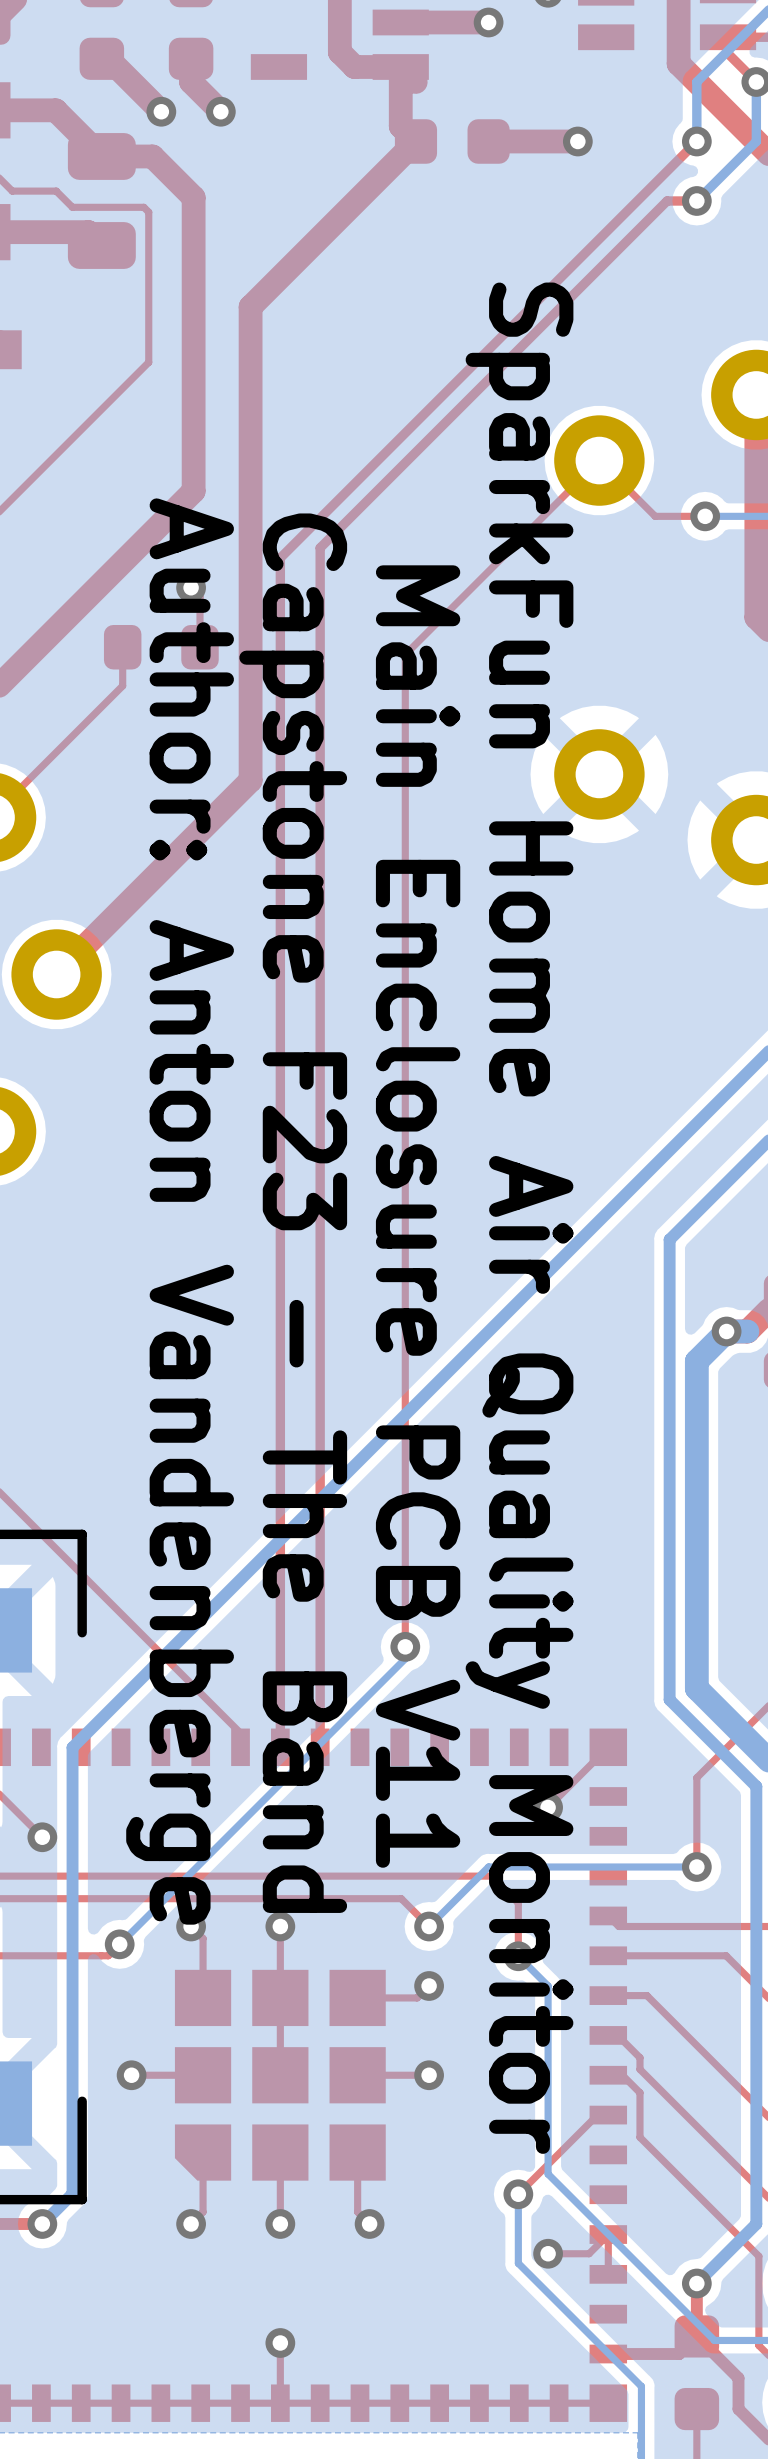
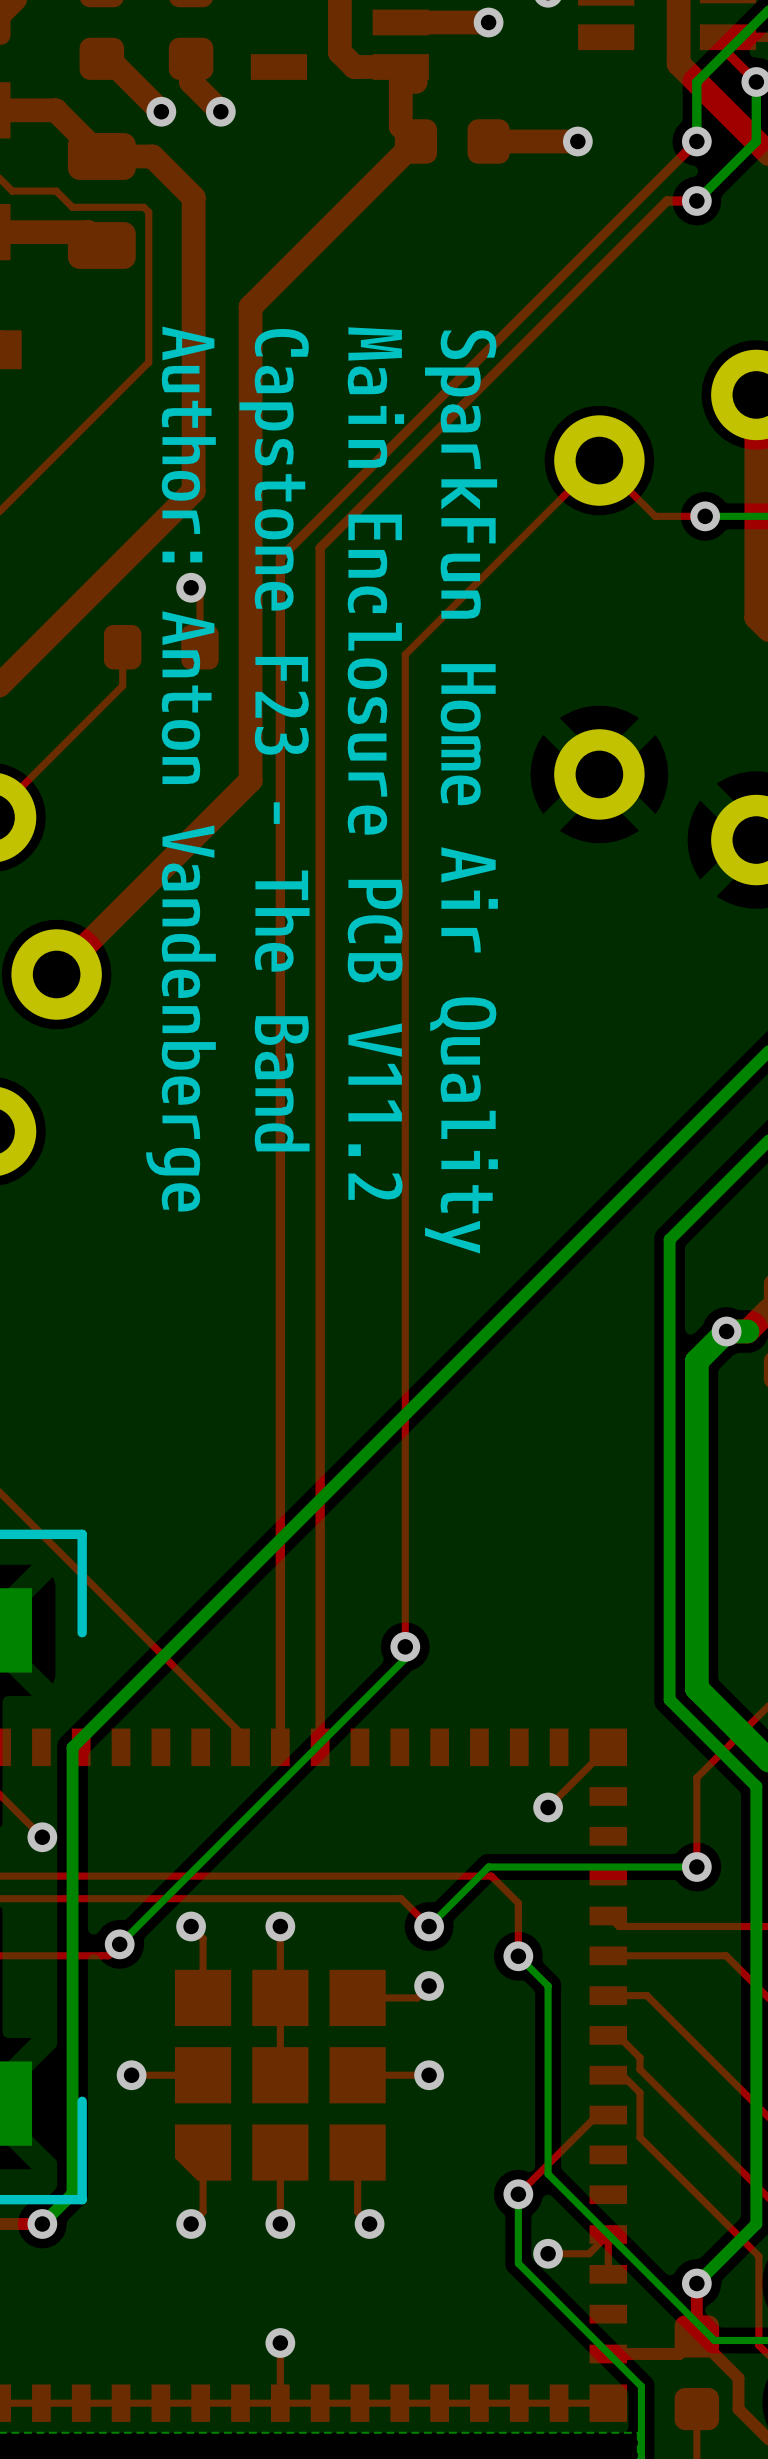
drawing: none -> [146, 326, 498, 1254]
text: Author: Anton Vandenberge (180, 1211) -> none
text: Capstone F23 - The Band (293, 1213) -> none
text: Main Enclosure PCB V11 (418, 1216) -> none
text: SparkFun Home Air Quality Monitor (519, 1218) -> none

